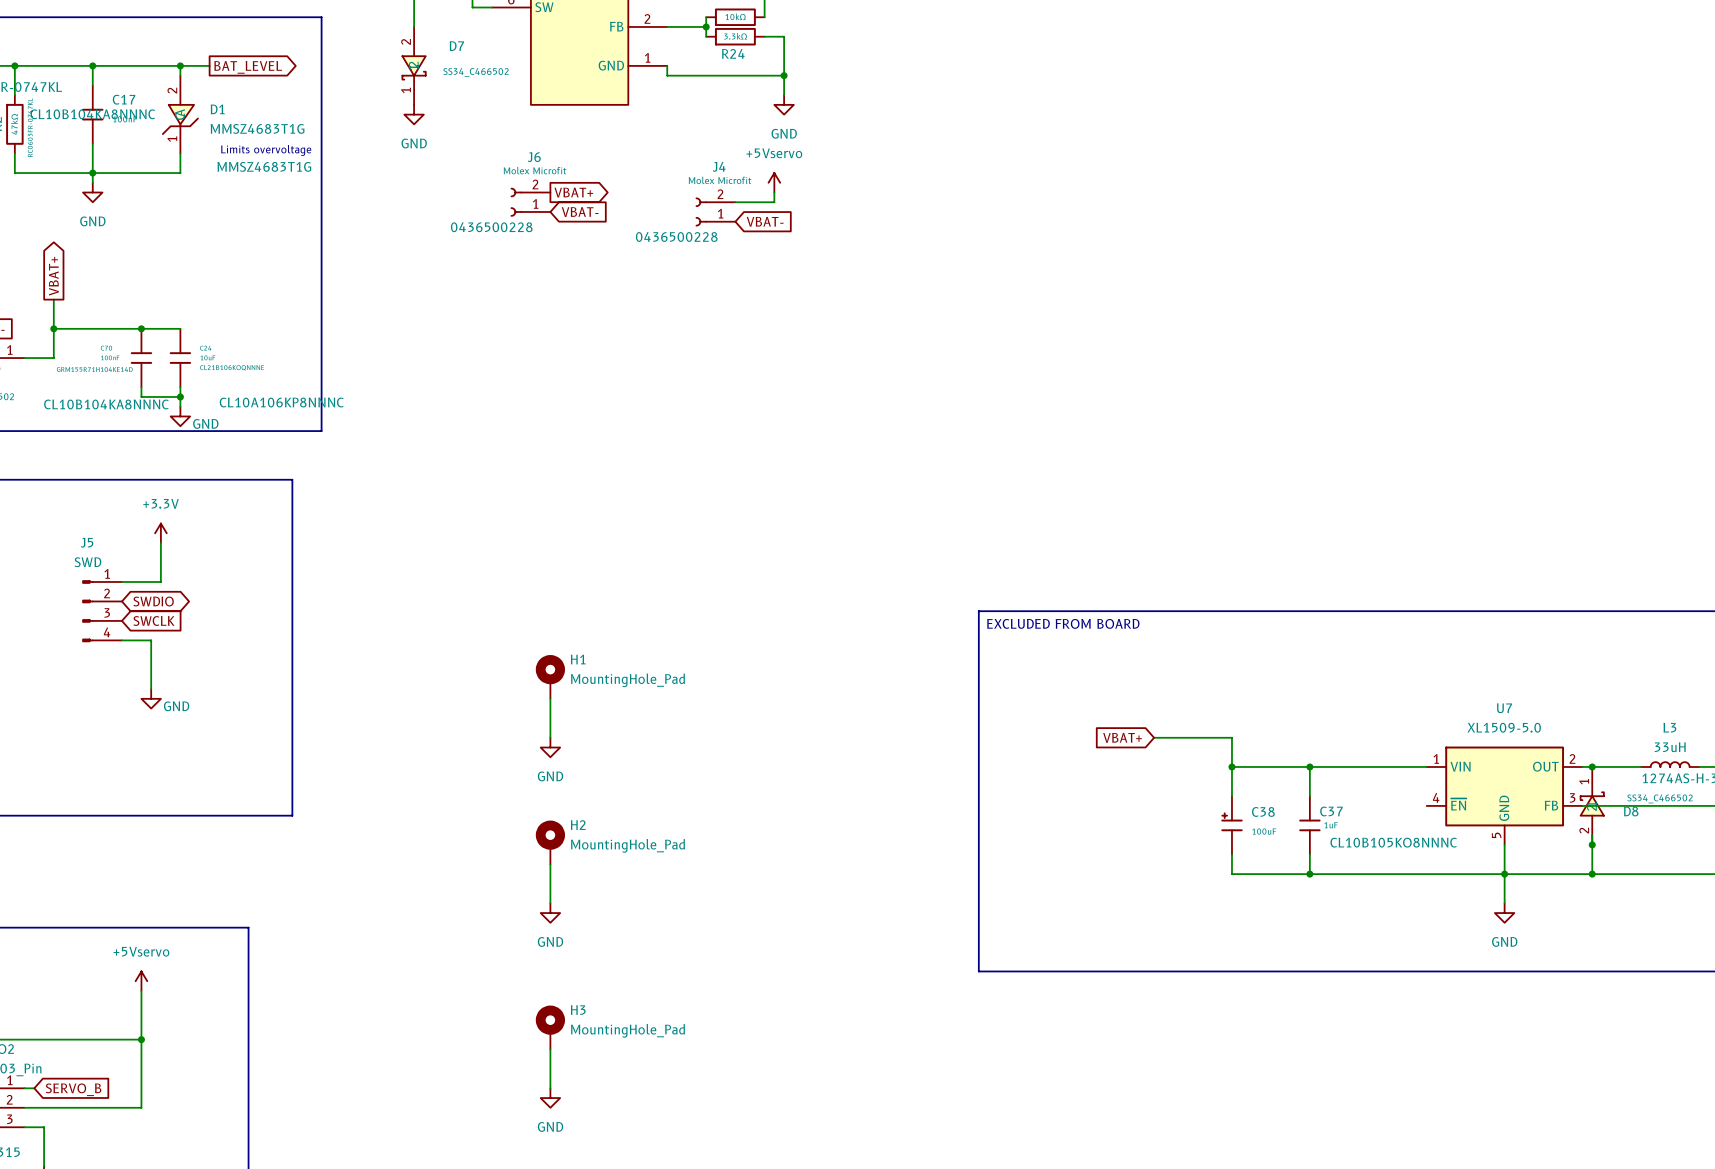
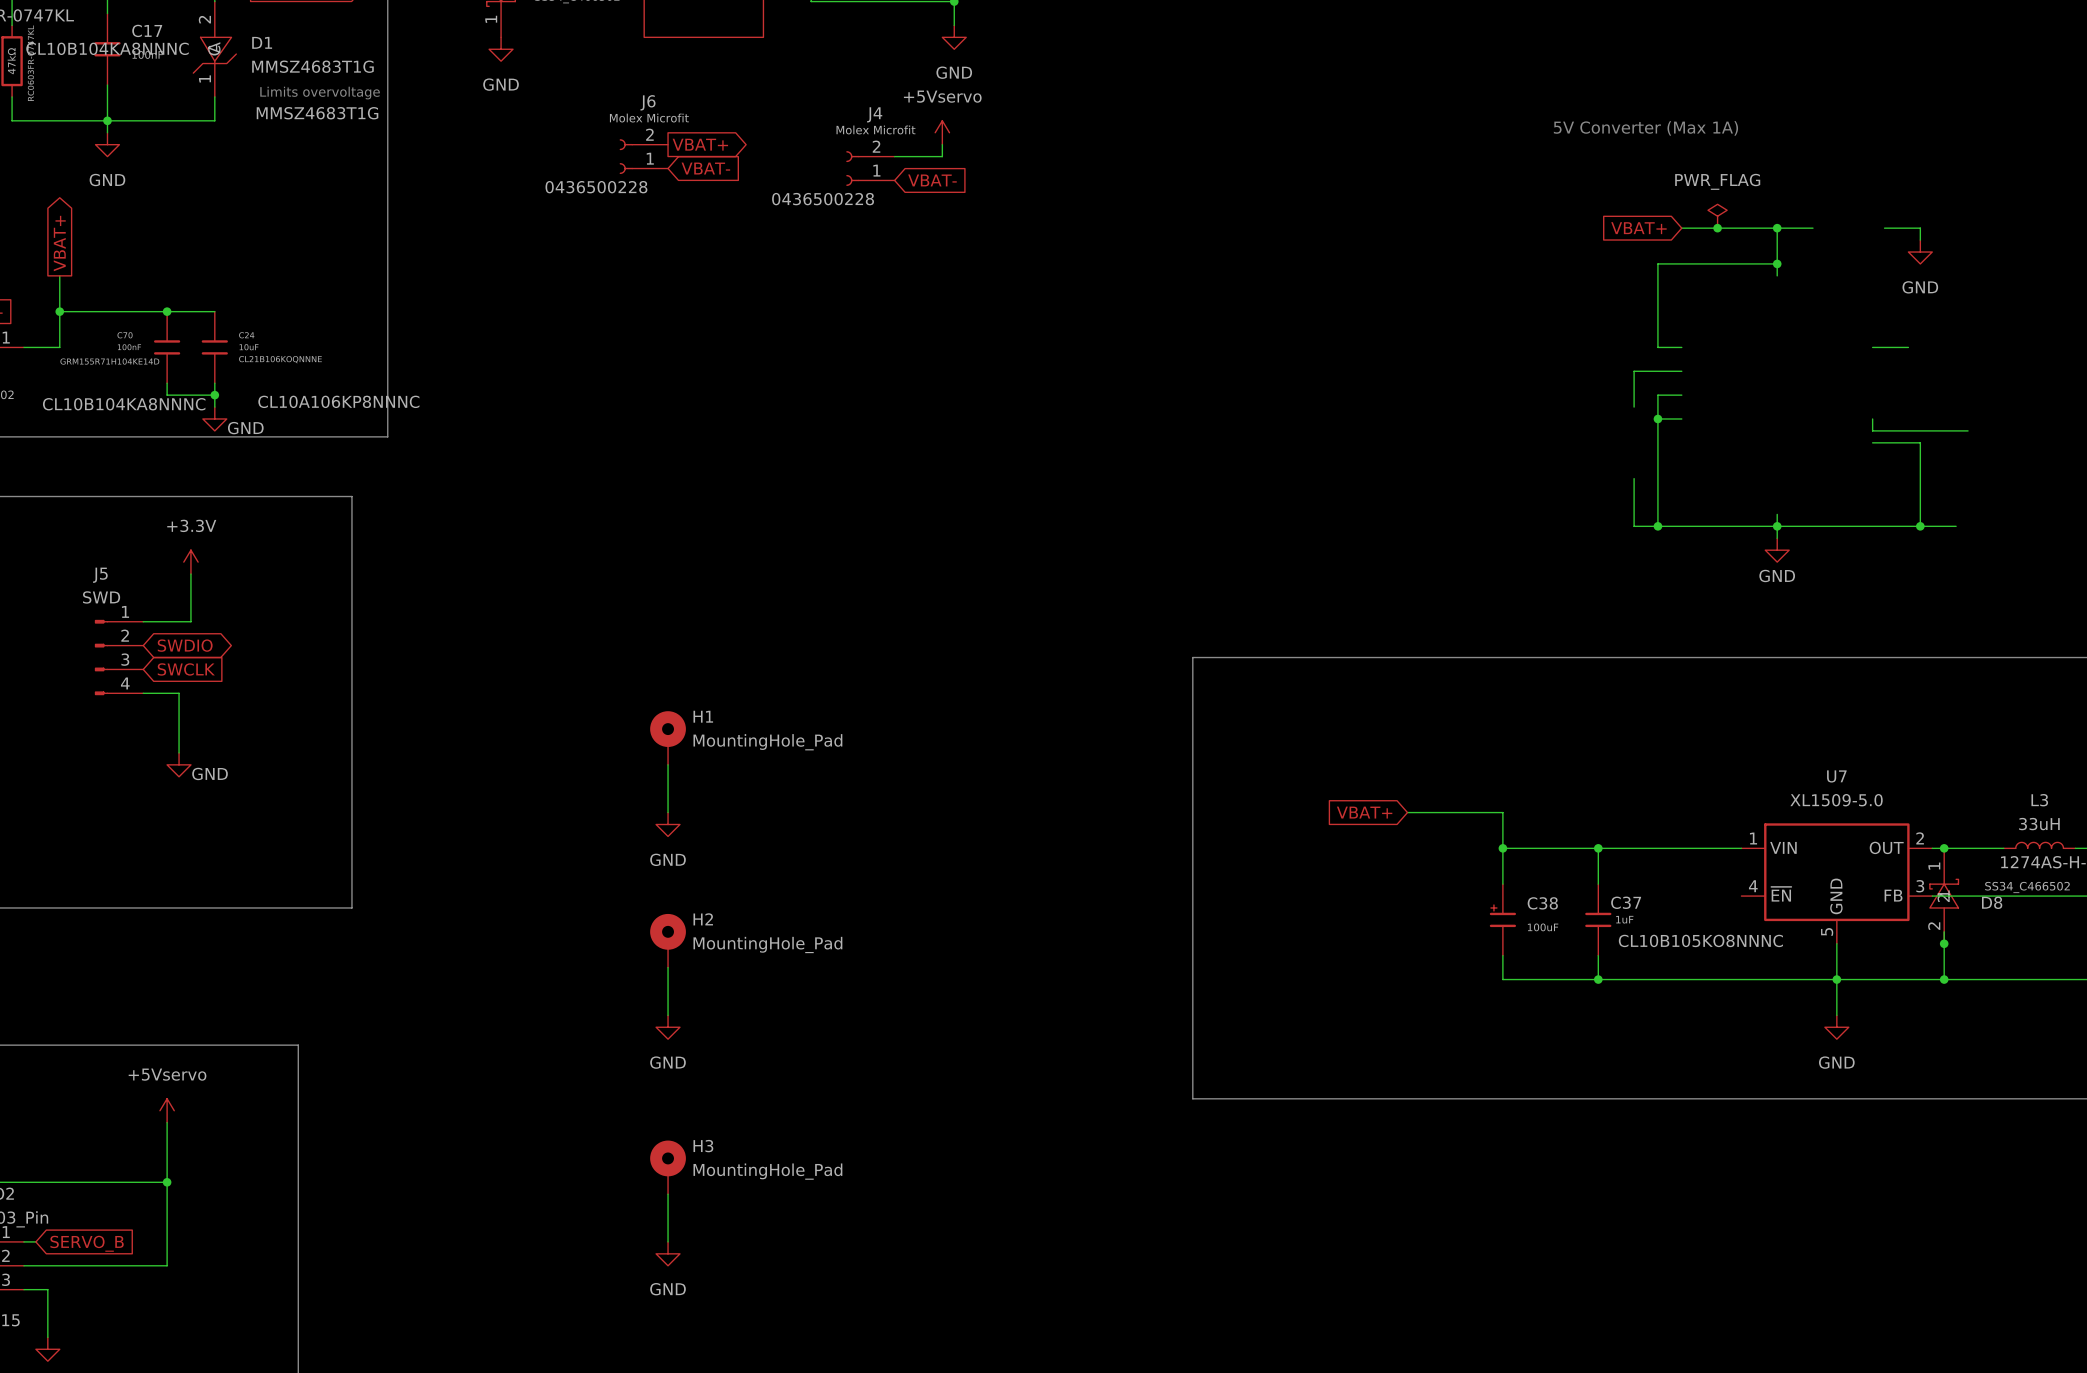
text: none -> 5V Converter (Max 1A) (1645, 128)
power symbol: none -> PWR_FLAG (1717, 216)
global label: none -> VBAT+ (1638, 228)
wire: none -> (1681, 228) (1812, 228)
junction: none -> (1717, 228)
wire: none -> (1777, 228) (1777, 275)
junction: none -> (1777, 228)
wire: none -> (1884, 228) (1920, 228) (1920, 240)
power symbol: none -> GND (1920, 252)
wire: none -> (1777, 263) (1657, 263) (1657, 347) (1681, 347)
junction: none -> (1777, 263)
wire: none -> (1872, 347) (1908, 347)
wire: none -> (1681, 371) (1634, 371) (1634, 407)
wire: none -> (1681, 395) (1657, 395) (1657, 526)
wire: none -> (1657, 418) (1681, 418)
junction: none -> (1657, 418)
wire: none -> (1872, 418) (1872, 430) (1968, 430)
wire: none -> (1872, 442) (1920, 442) (1920, 526)
wire: none -> (1634, 478) (1634, 526) (1956, 526)
wire: none -> (1777, 514) (1777, 538)
junction: none -> (1657, 526)
junction: none -> (1777, 526)
junction: none -> (1920, 526)
power symbol: none -> GND (1777, 550)
text: EXCLUDED FROM BOARD (1063, 623) -> none

